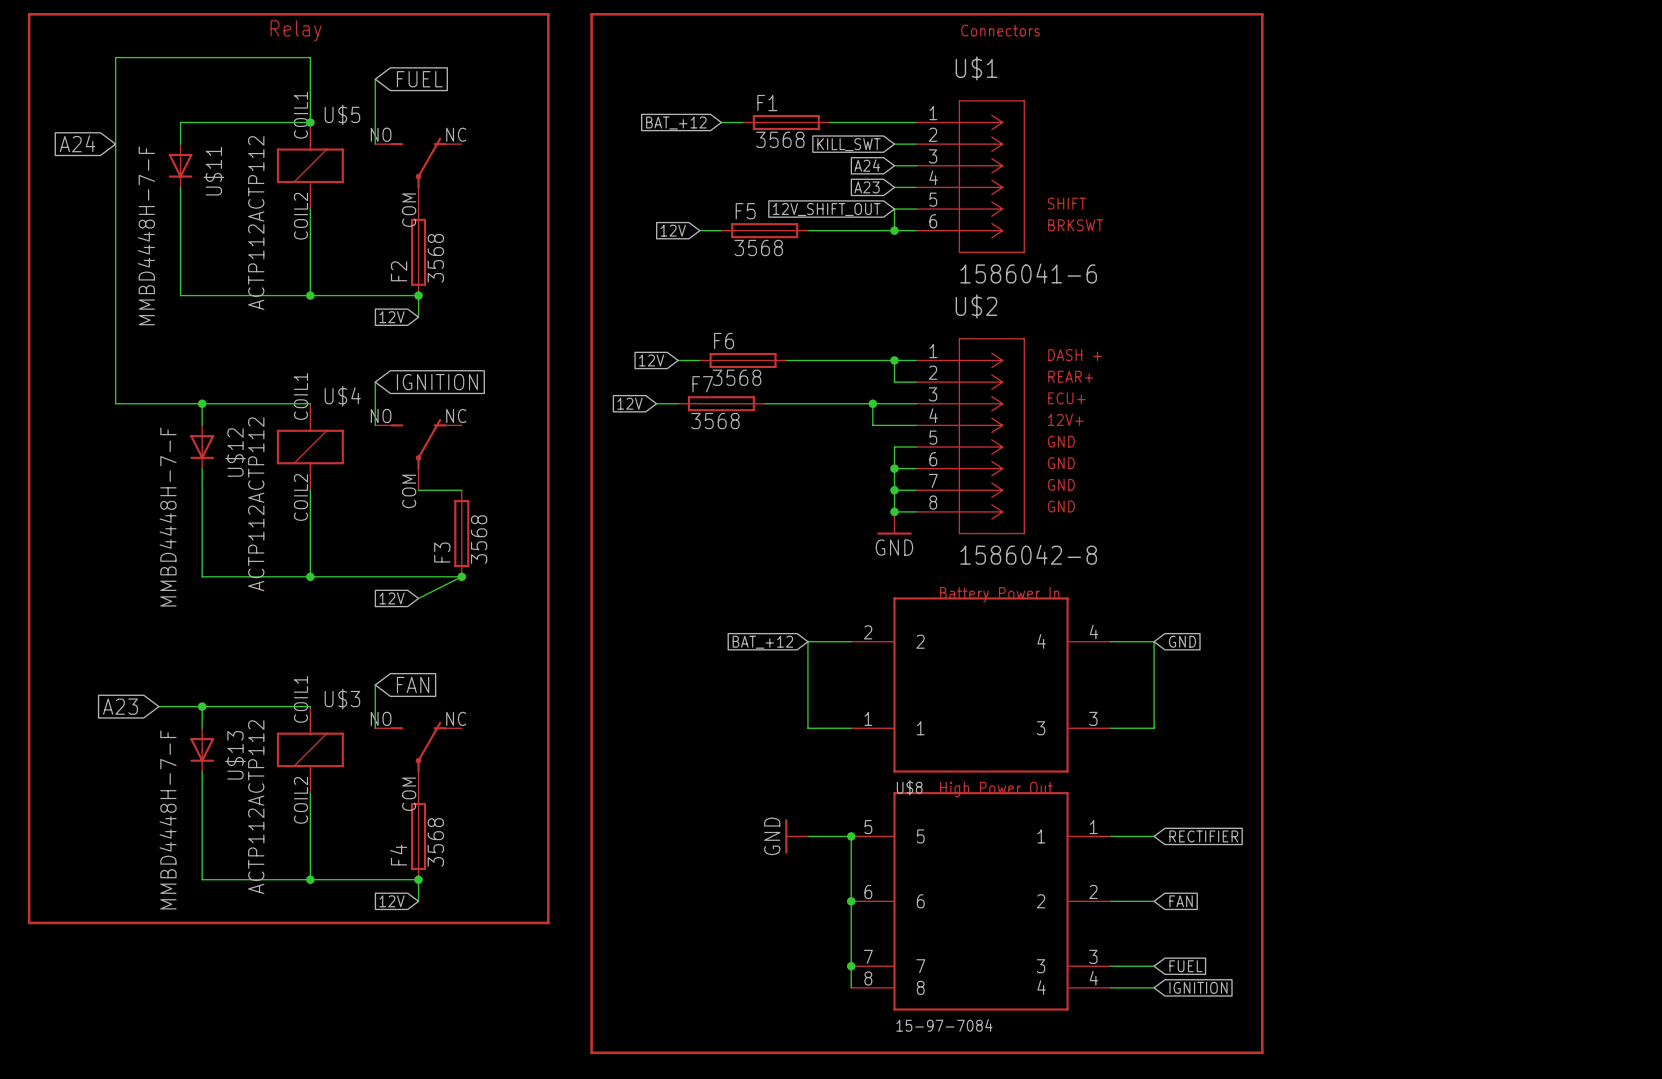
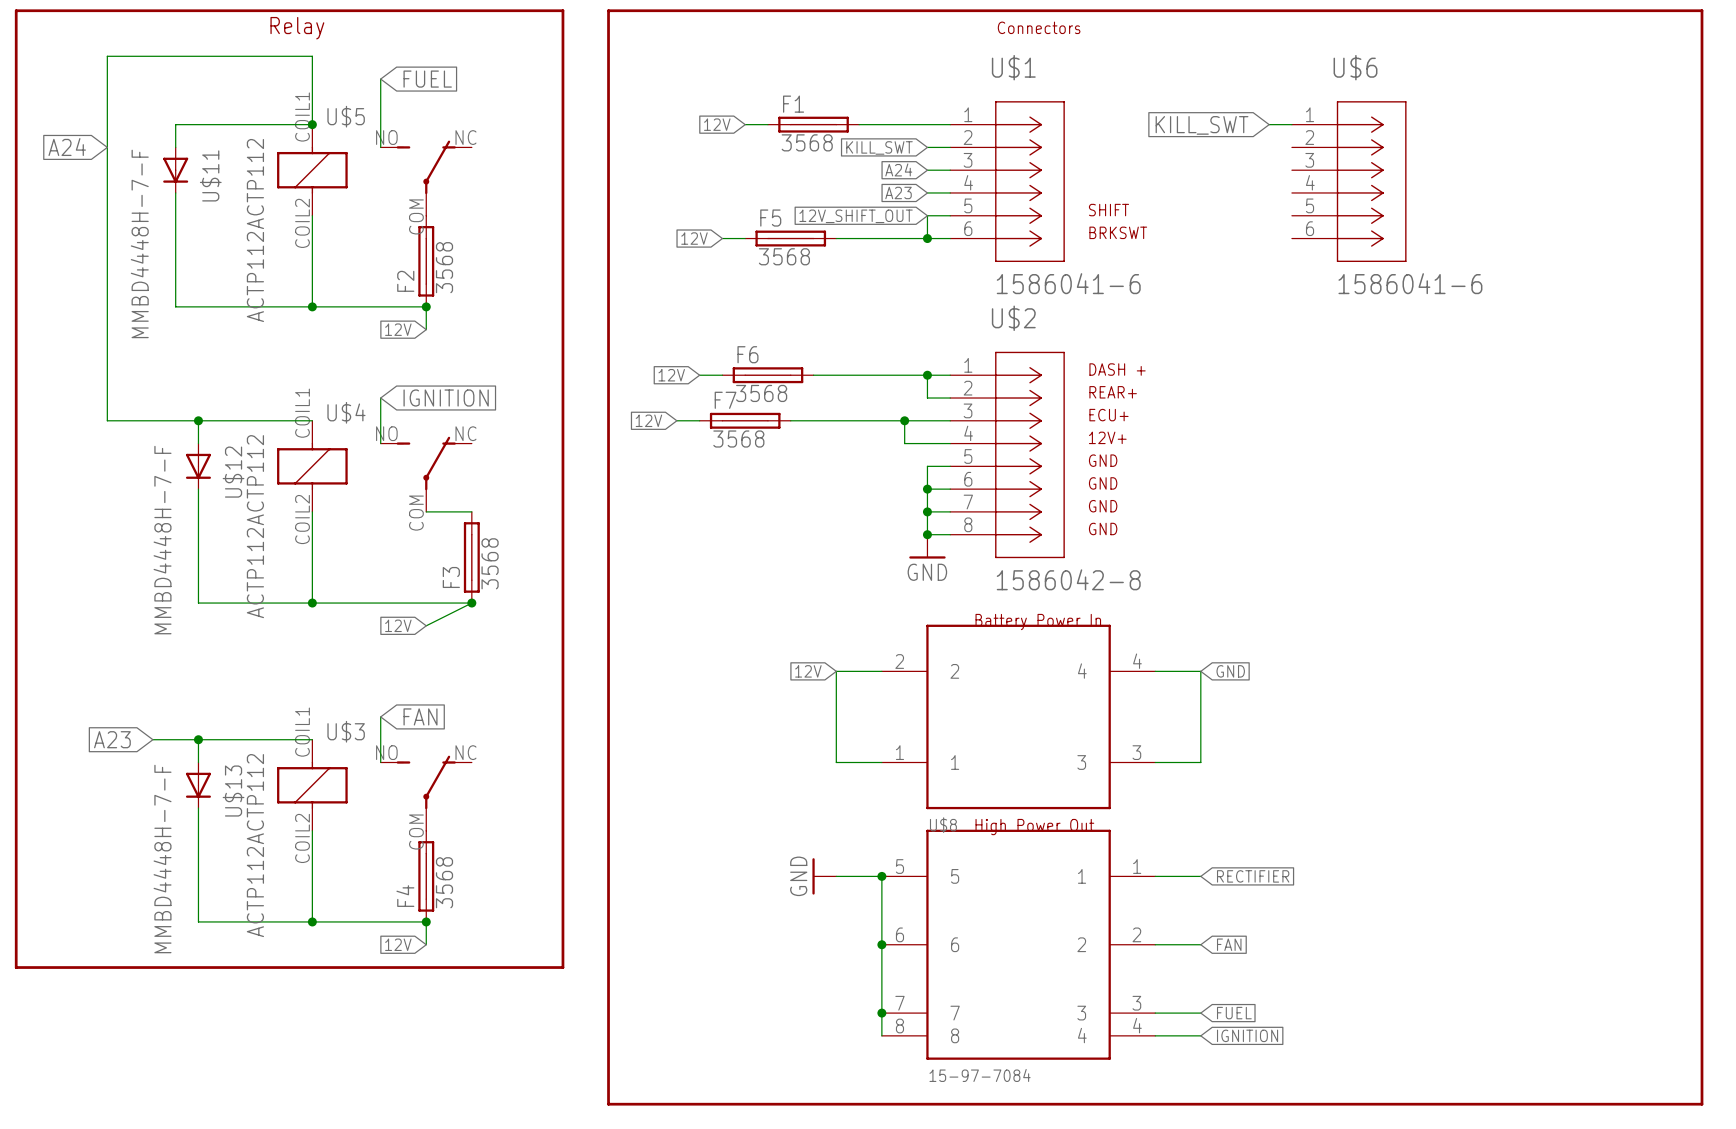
line: (1262, 14) (1262, 1052) -> (1314, 10) (1701, 10) (1701, 1104) (1314, 1104)
wire: none -> (1269, 124) (1291, 124)
global label: BAT_+12 (676, 123) -> 12V (717, 124)
global label: none -> KILL_SWT (1202, 125)
U$6: none -> 1586041-6 (1349, 181)
global label: BAT_+12 (762, 642) -> 12V (808, 671)

